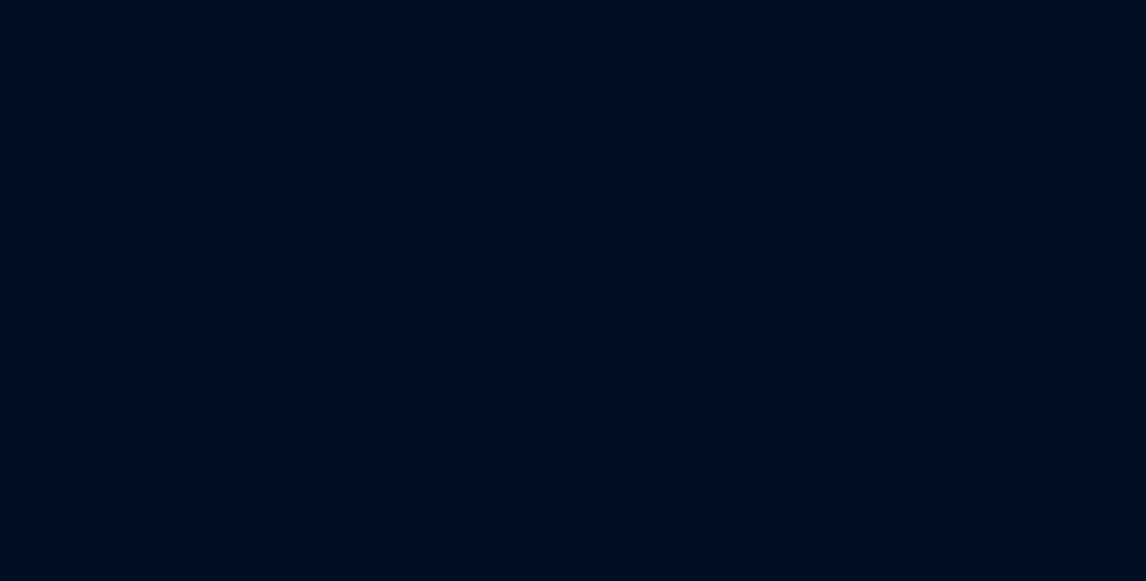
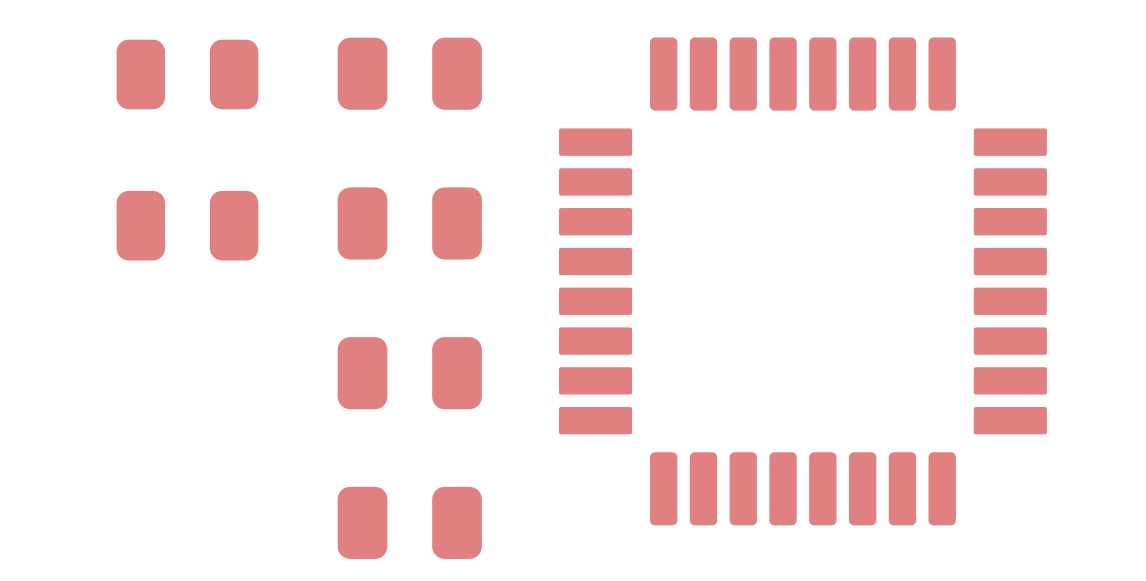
part: none -> (409, 73)
part: none -> (187, 74)
part: none -> (409, 223)
part: none -> (187, 225)
part: none -> (802, 281)
part: none -> (409, 373)
part: none -> (409, 522)

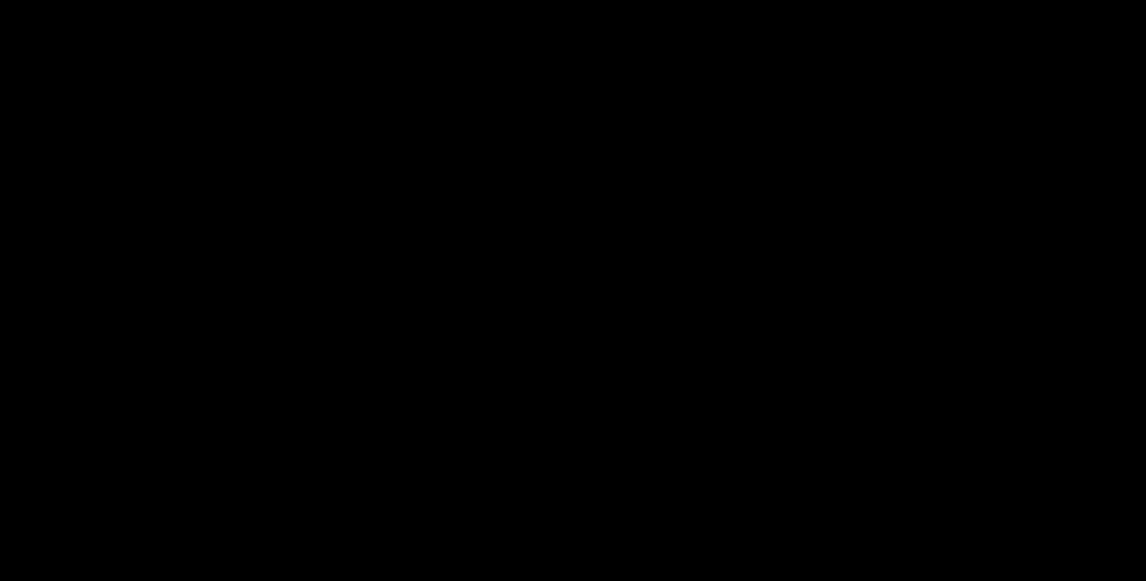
part: (409, 73) -> none
part: (187, 74) -> none
part: (409, 223) -> none
part: (187, 225) -> none
part: (802, 281) -> none
part: (409, 373) -> none
part: (409, 522) -> none

